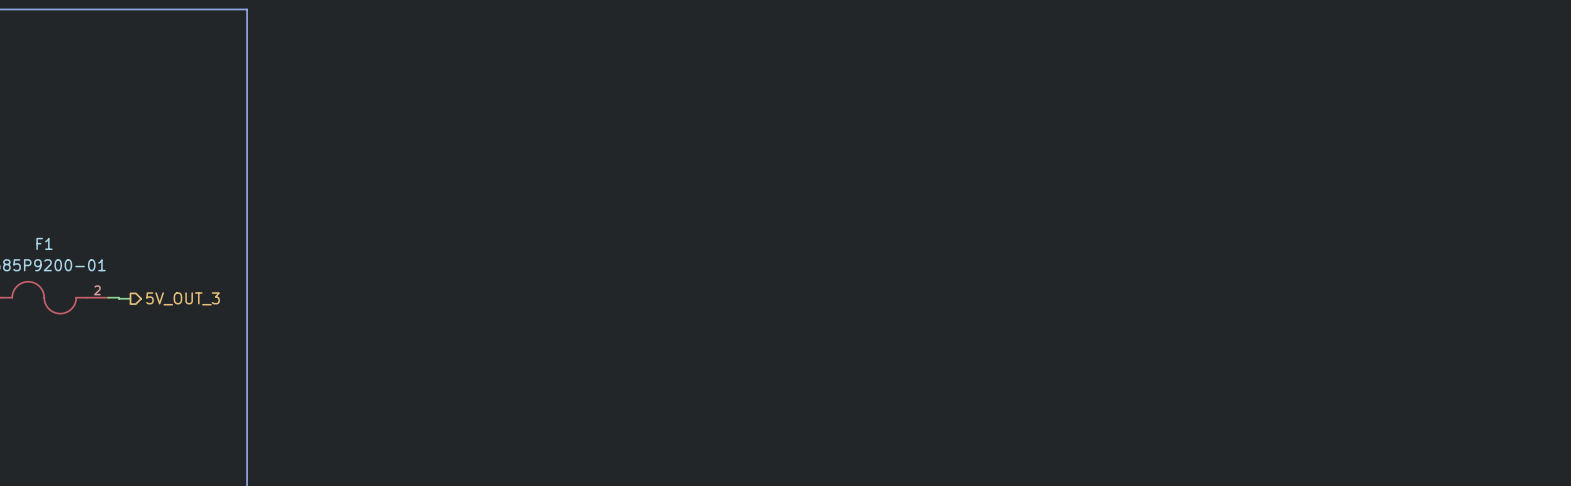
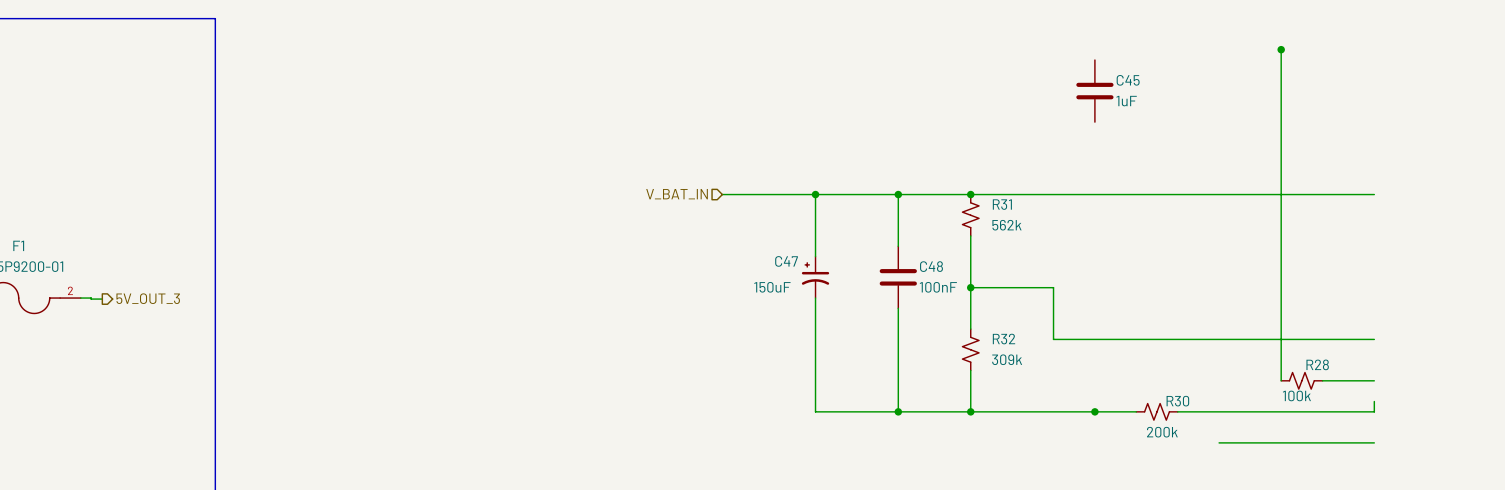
wire: none -> (1281, 49) (1281, 380)
junction: none -> (1281, 49)
C45: none -> 1uF (1094, 91)
wire: none -> (722, 194) (1374, 194)
wire: none -> (815, 194) (815, 256)
junction: none -> (815, 194)
wire: none -> (898, 194) (898, 246)
junction: none -> (898, 194)
junction: none -> (970, 194)
hierarchical label: none -> V_BAT_IN (677, 194)
R31: none -> 562k (970, 215)
wire: none -> (970, 235) (970, 329)
C47: none -> 150uF (815, 277)
C48: none -> 100nF (898, 277)
wire: none -> (970, 287) (1053, 287) (1053, 339) (1374, 339)
junction: none -> (970, 287)
wire: none -> (815, 298) (815, 411) (1136, 411)
wire: none -> (898, 308) (898, 411)
R32: none -> 309k (970, 349)
wire: none -> (970, 370) (970, 411)
R28: none -> 100k (1301, 380)
wire: none -> (1322, 380) (1374, 380)
wire: none -> (1374, 401) (1374, 411) (1177, 411)
junction: none -> (898, 411)
junction: none -> (970, 411)
junction: none -> (1094, 411)
R30: none -> 200k (1157, 411)
wire: none -> (1219, 442) (1374, 442)

